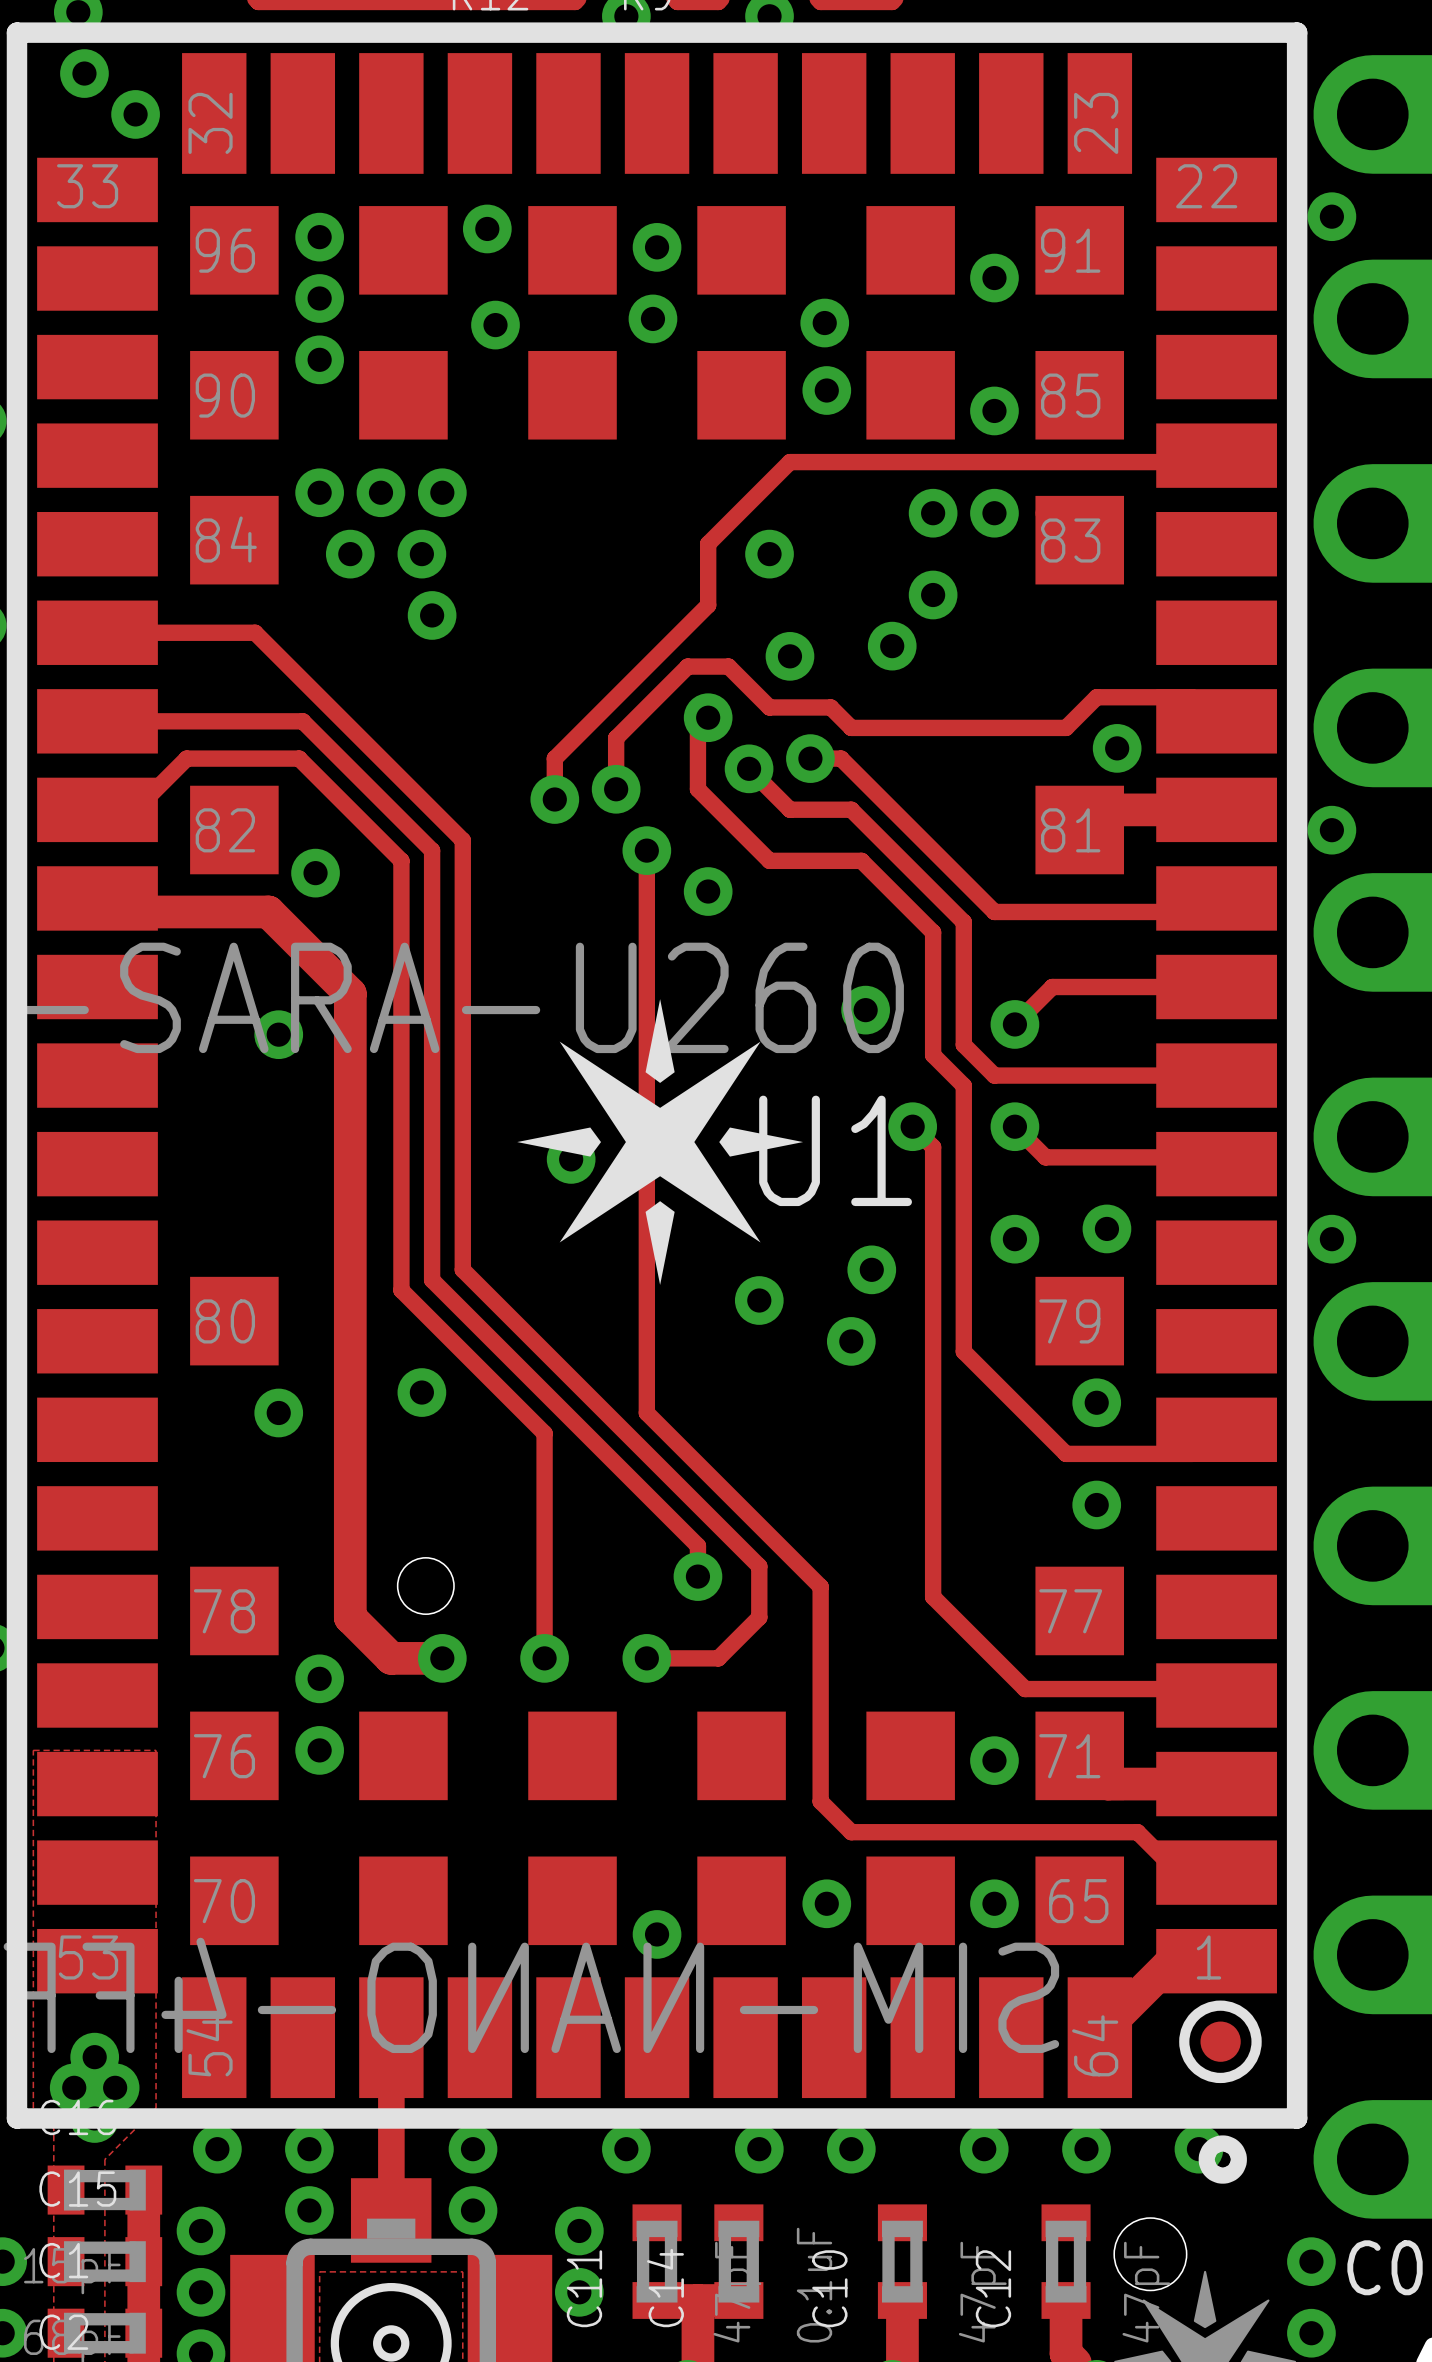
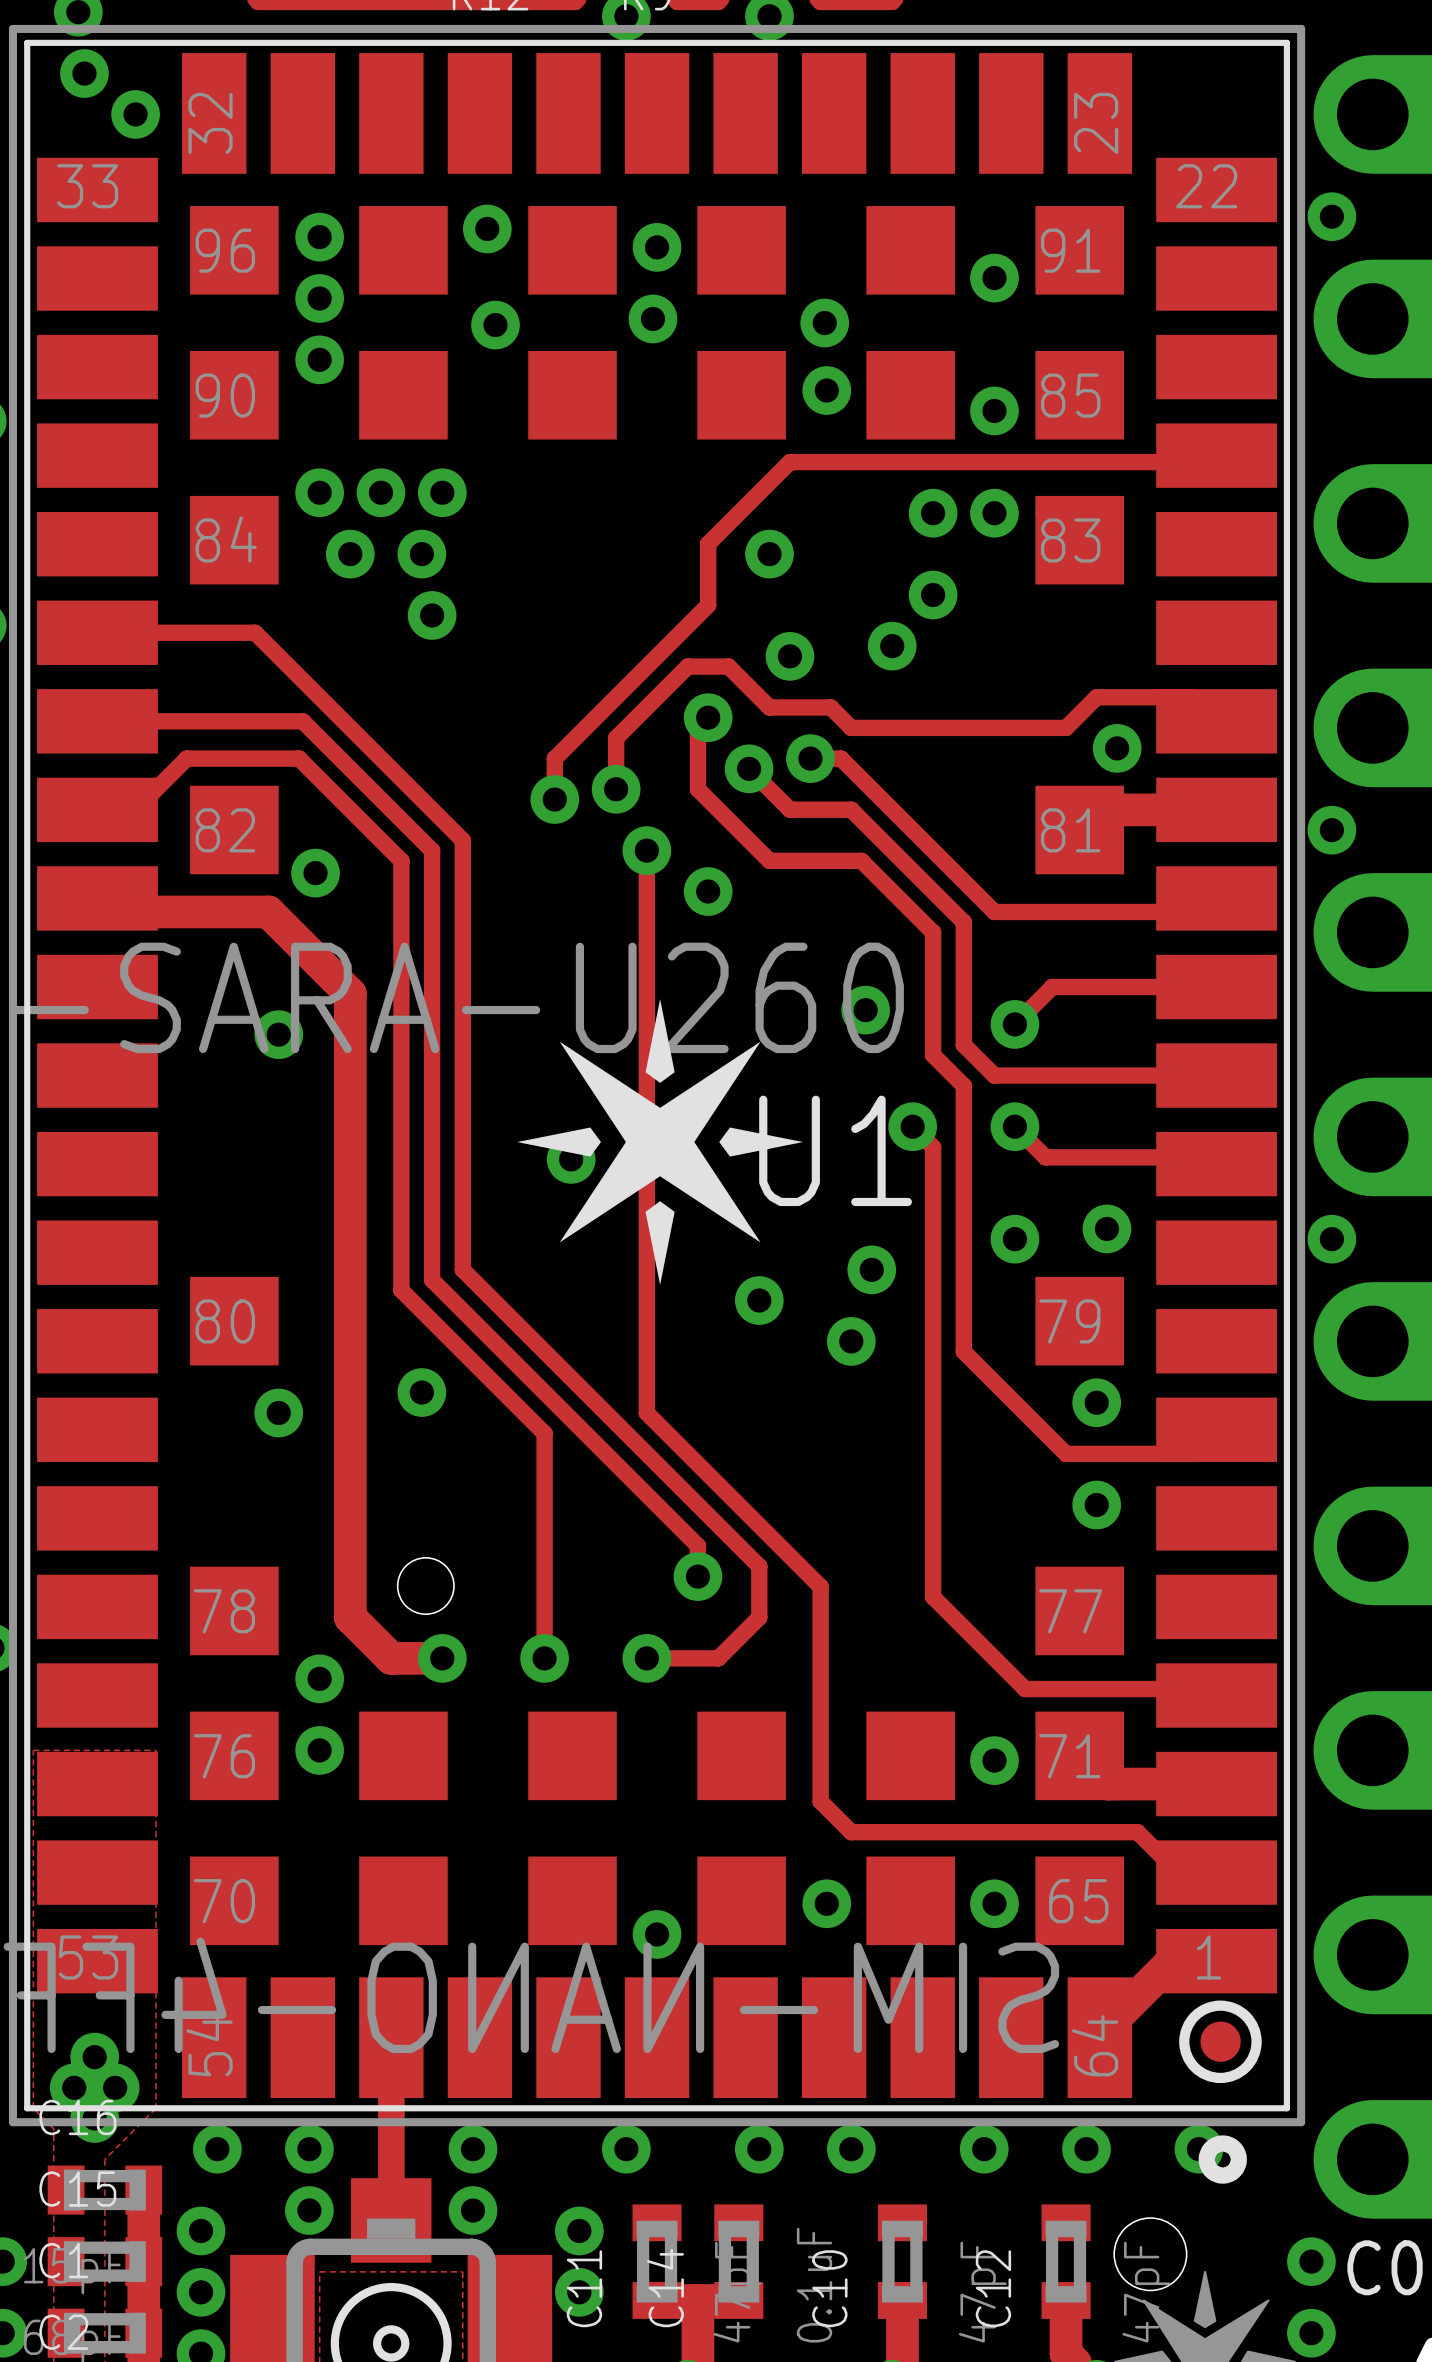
line: (16, 32) (1297, 32) (1297, 2118) (16, 2118) (16, 32) -> (27, 42) (27, 2108) (1286, 2108) (1286, 42) (27, 42)

